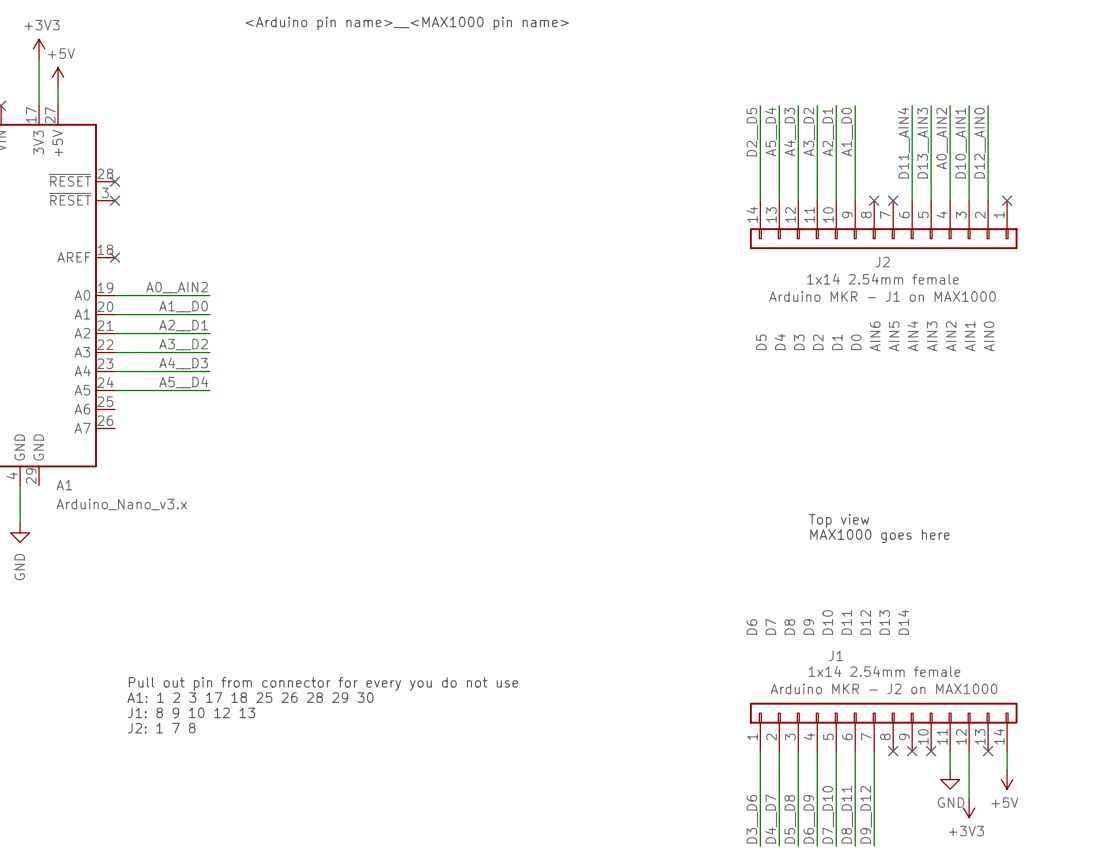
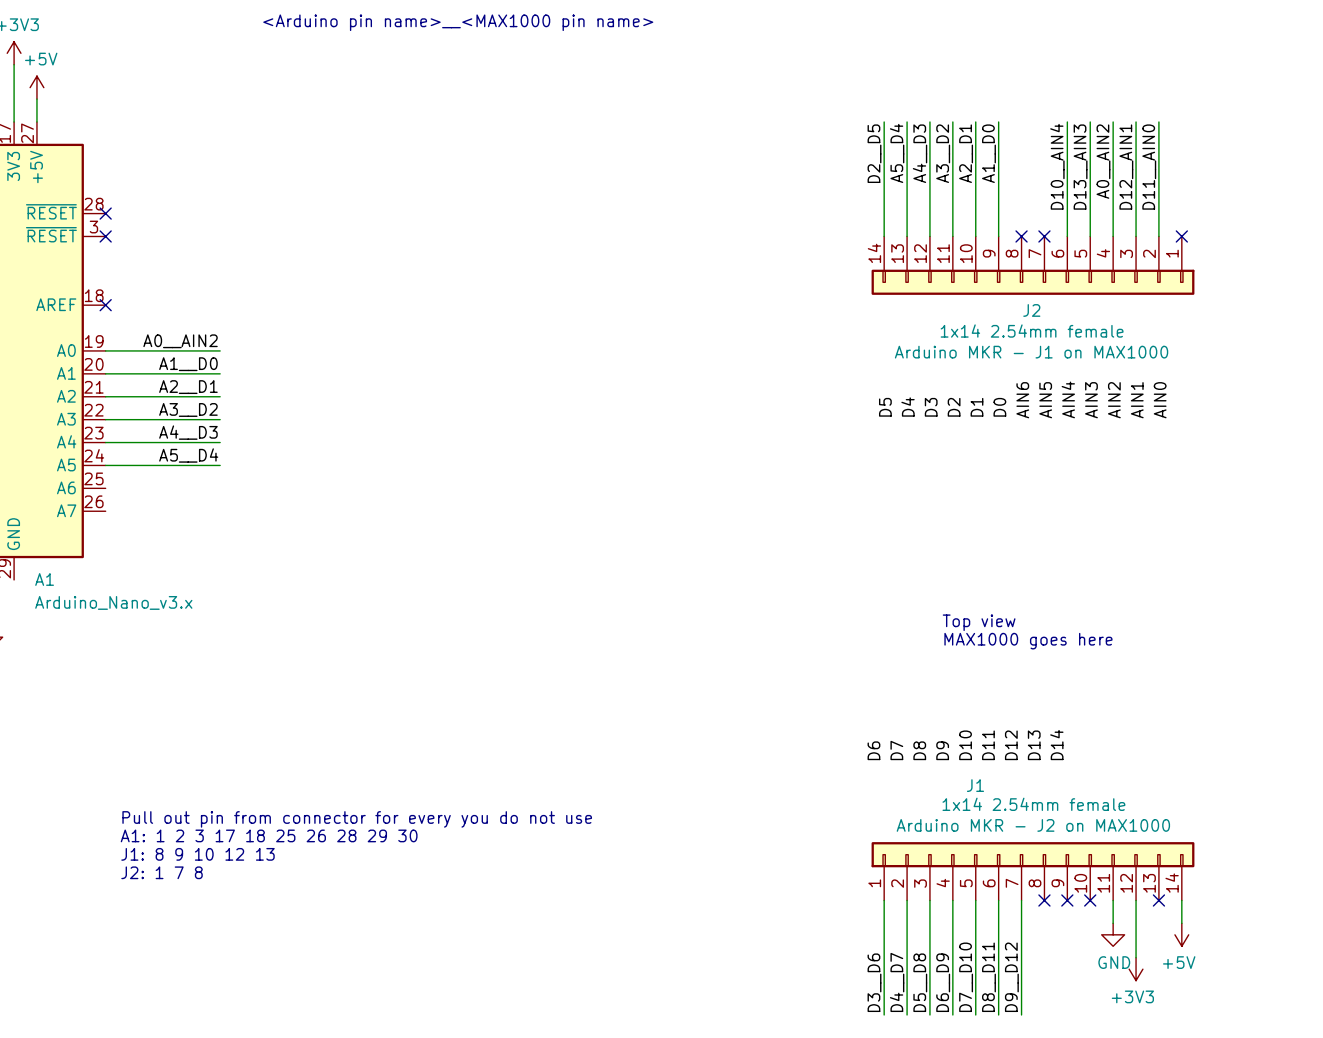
label: D11__AIN4 (903, 142) -> D10__AIN4 (1057, 166)
label: D10__AIN1 (961, 143) -> D12__AIN1 (1126, 167)
label: D12__AIN0 (980, 143) -> D11__AIN0 (1149, 167)

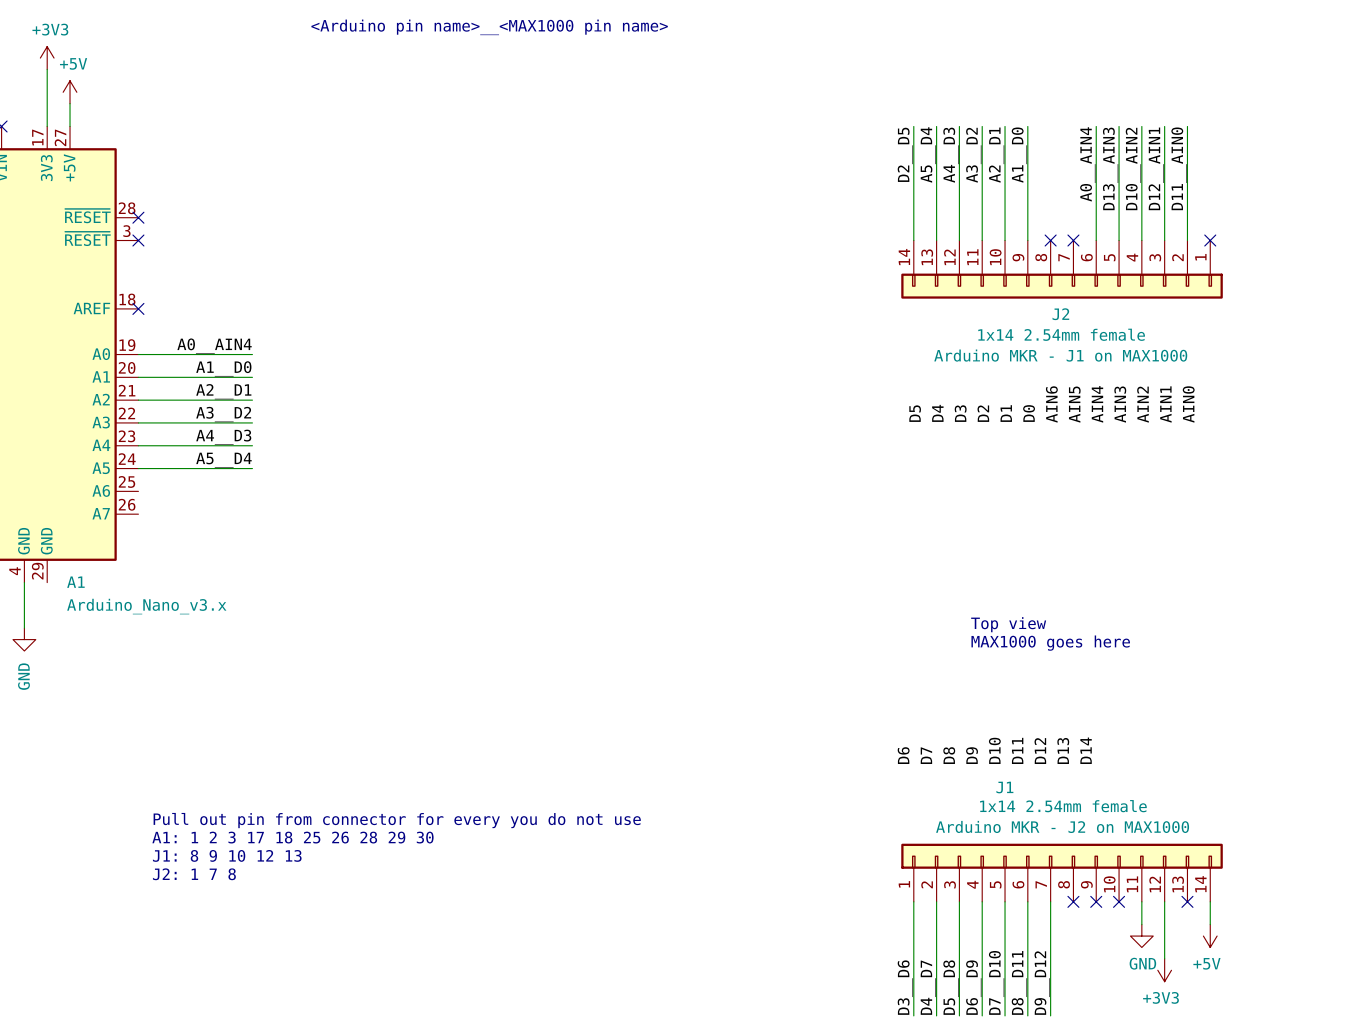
label: A0__AIN2 (1103, 161) -> D10__AIN2 (1133, 169)
label: D10__AIN4 (1057, 166) -> A0__AIN4 (1087, 164)
label: A0__AIN2 (180, 341) -> A0__AIN4 (214, 346)

